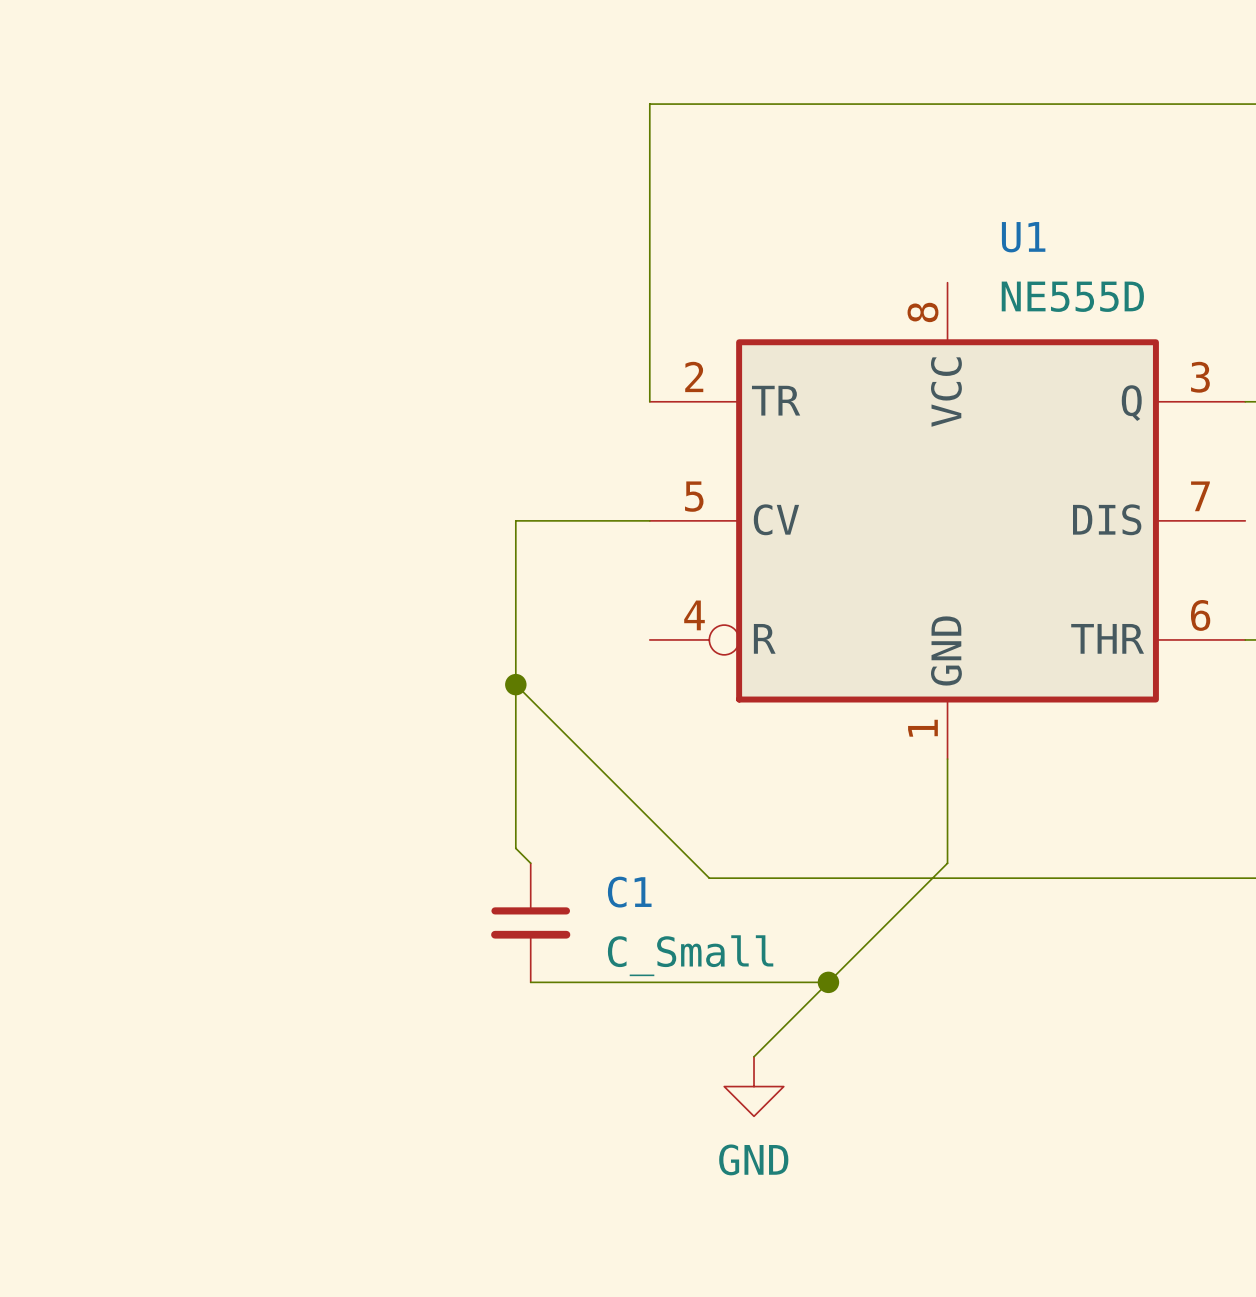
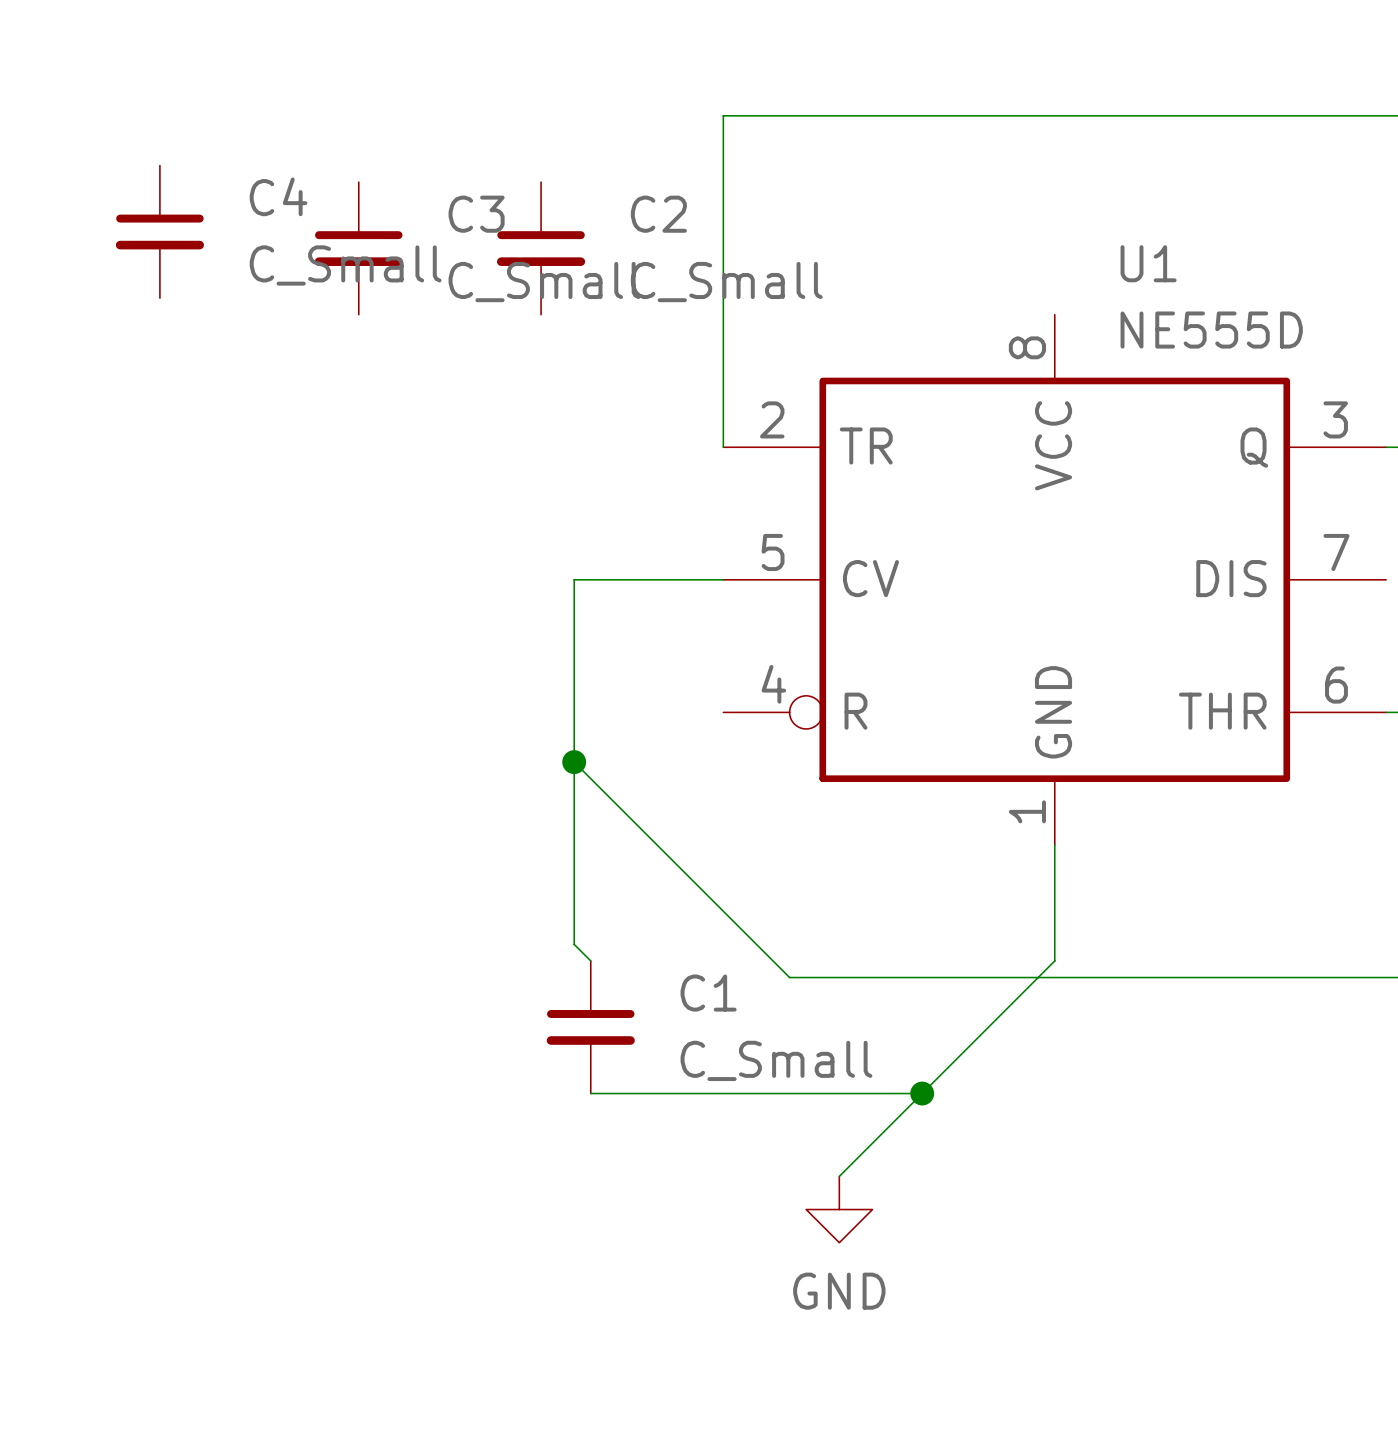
C4: none -> C_Small (159, 231)
C3: none -> C_Small (358, 248)
C2: none -> C_Small (541, 248)

